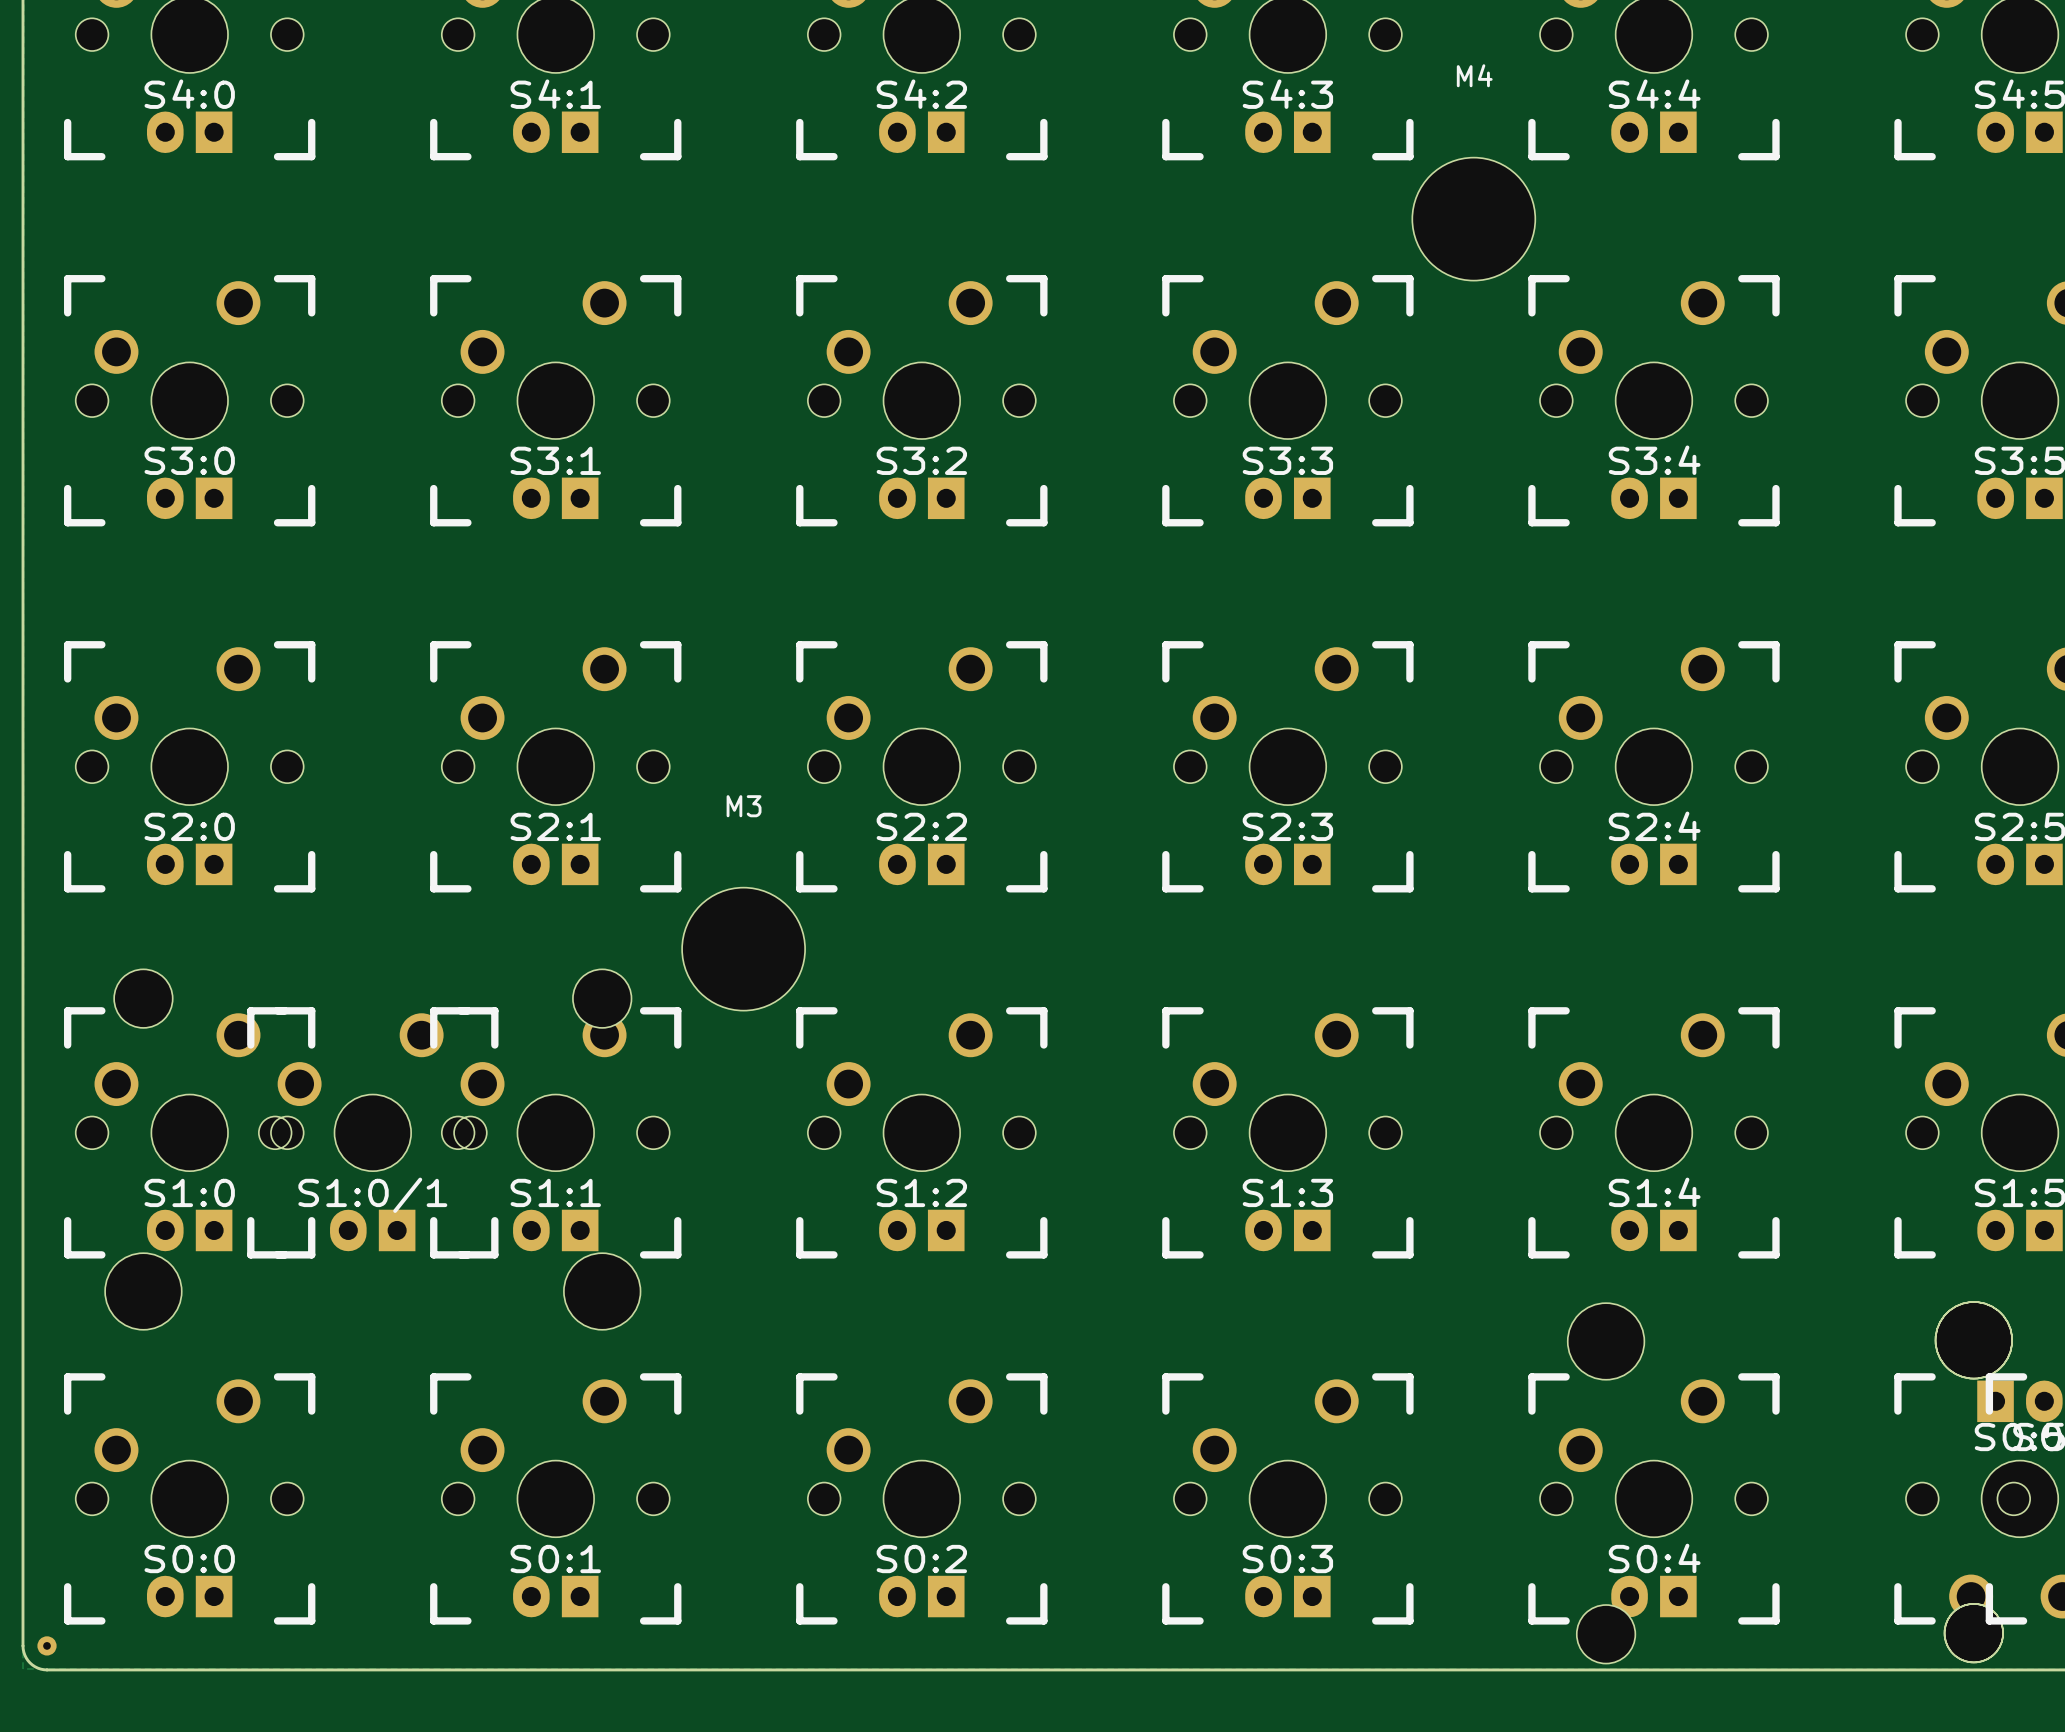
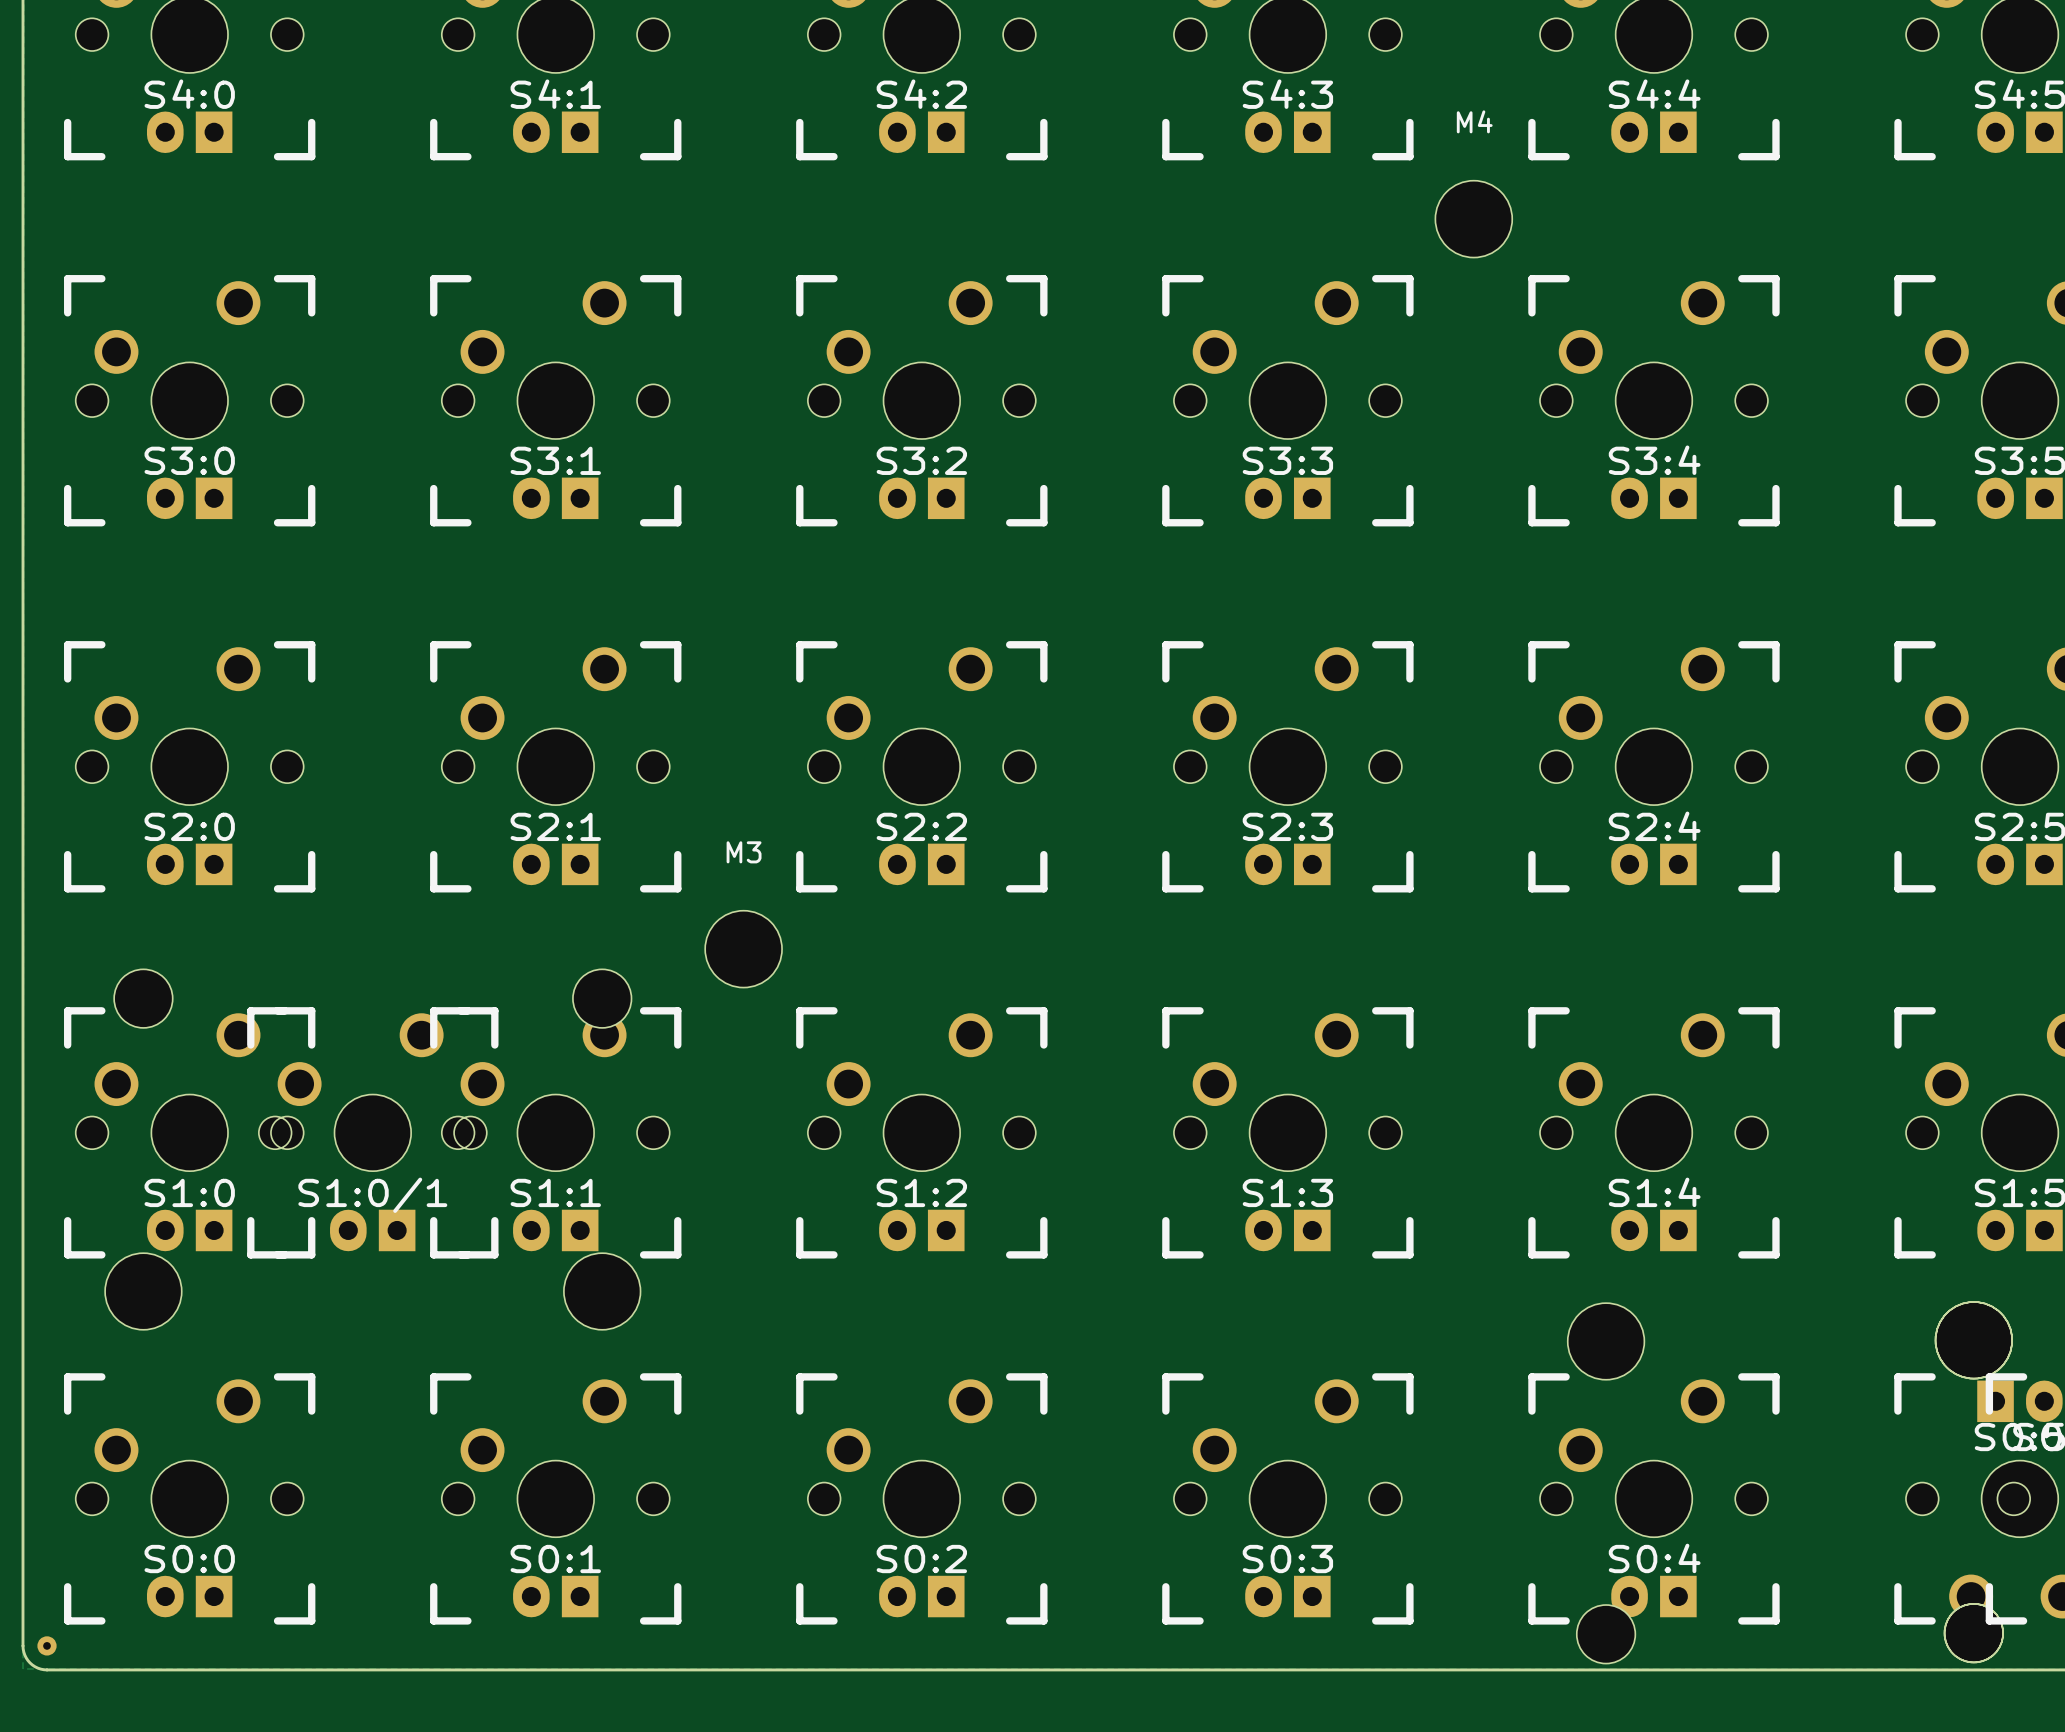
M4 name position: M4 (1474, 75) -> M4 (1474, 121)
M4 footprint: [1412, 157, 1536, 281] -> [1435, 180, 1513, 258]
M3 name position: M3 (744, 806) -> M3 (744, 852)
M3 footprint: [682, 887, 806, 1011] -> [705, 910, 783, 988]

